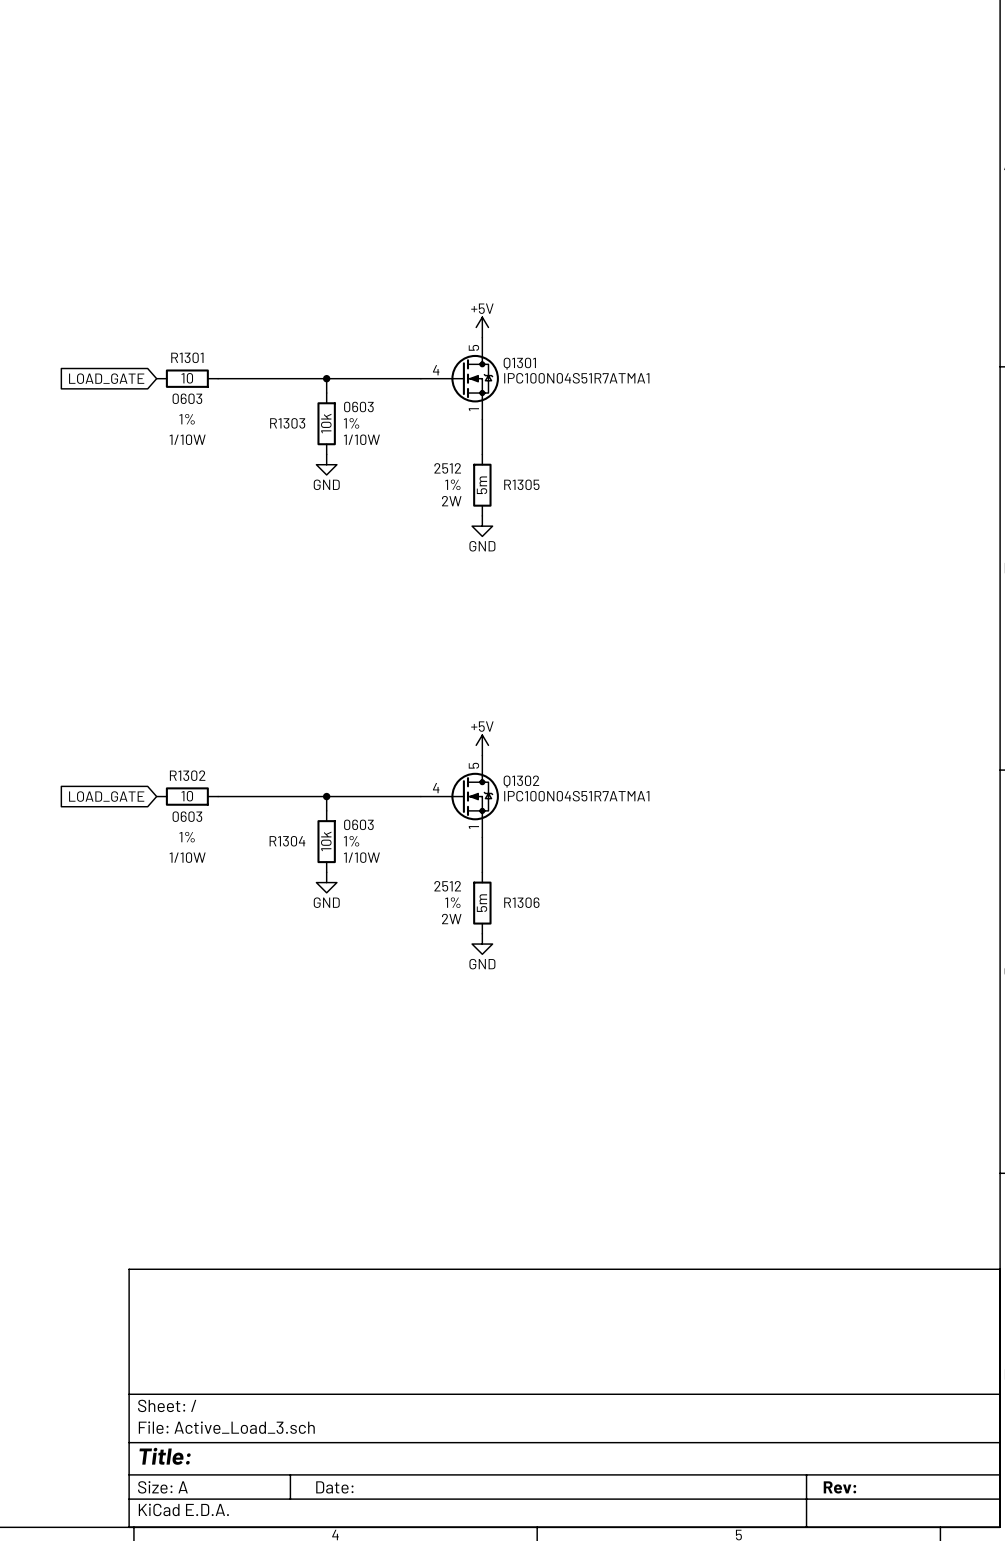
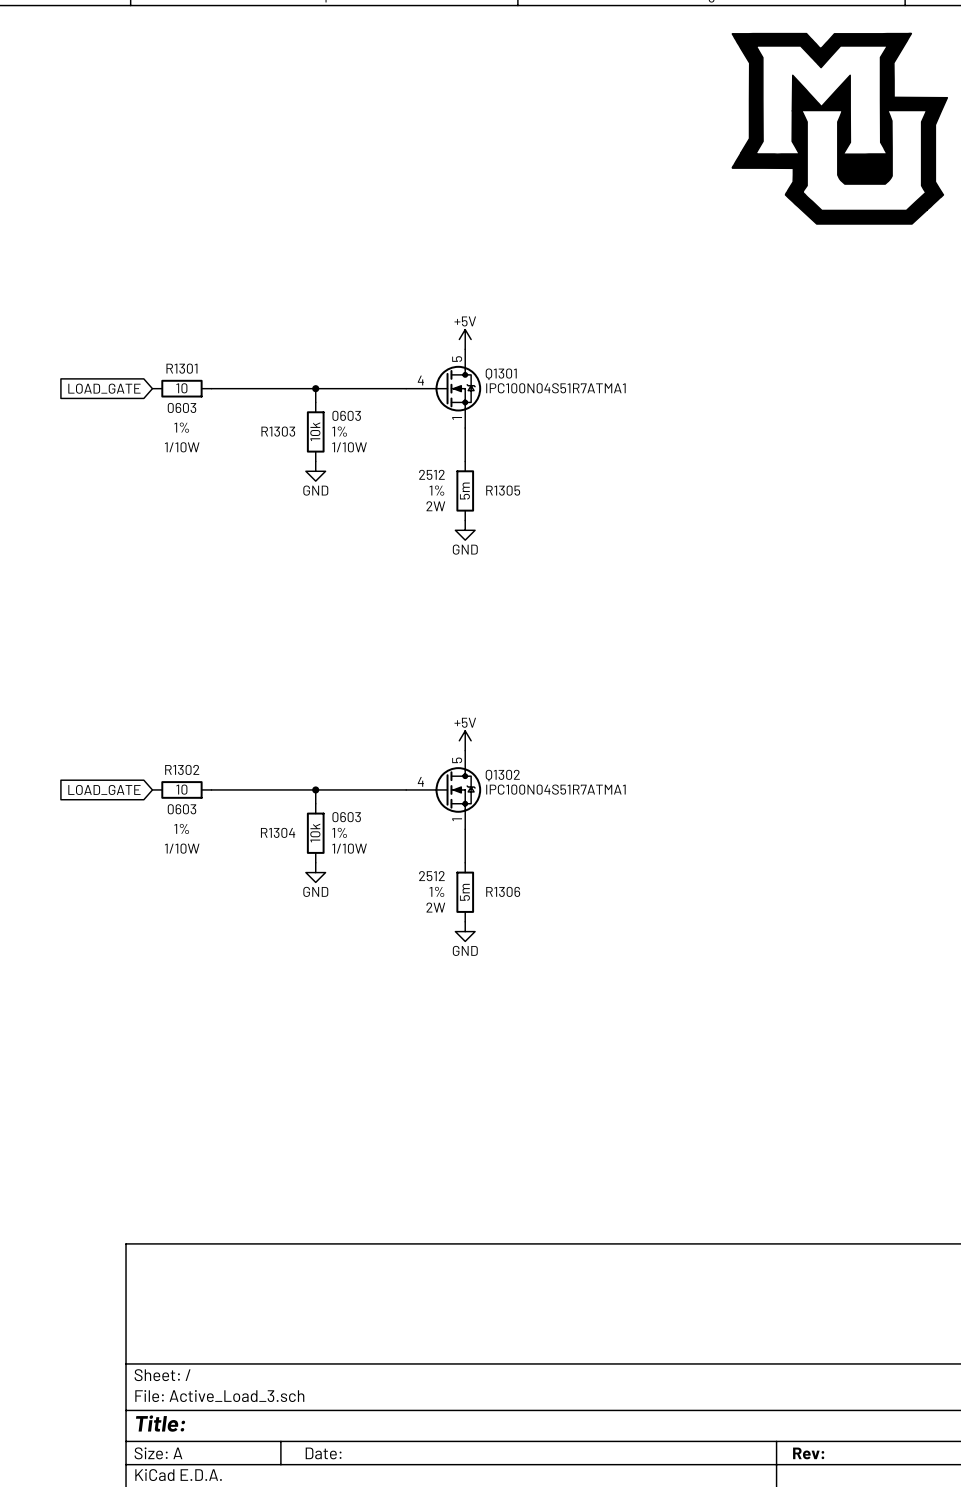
power symbol: none -> (839, 128)

